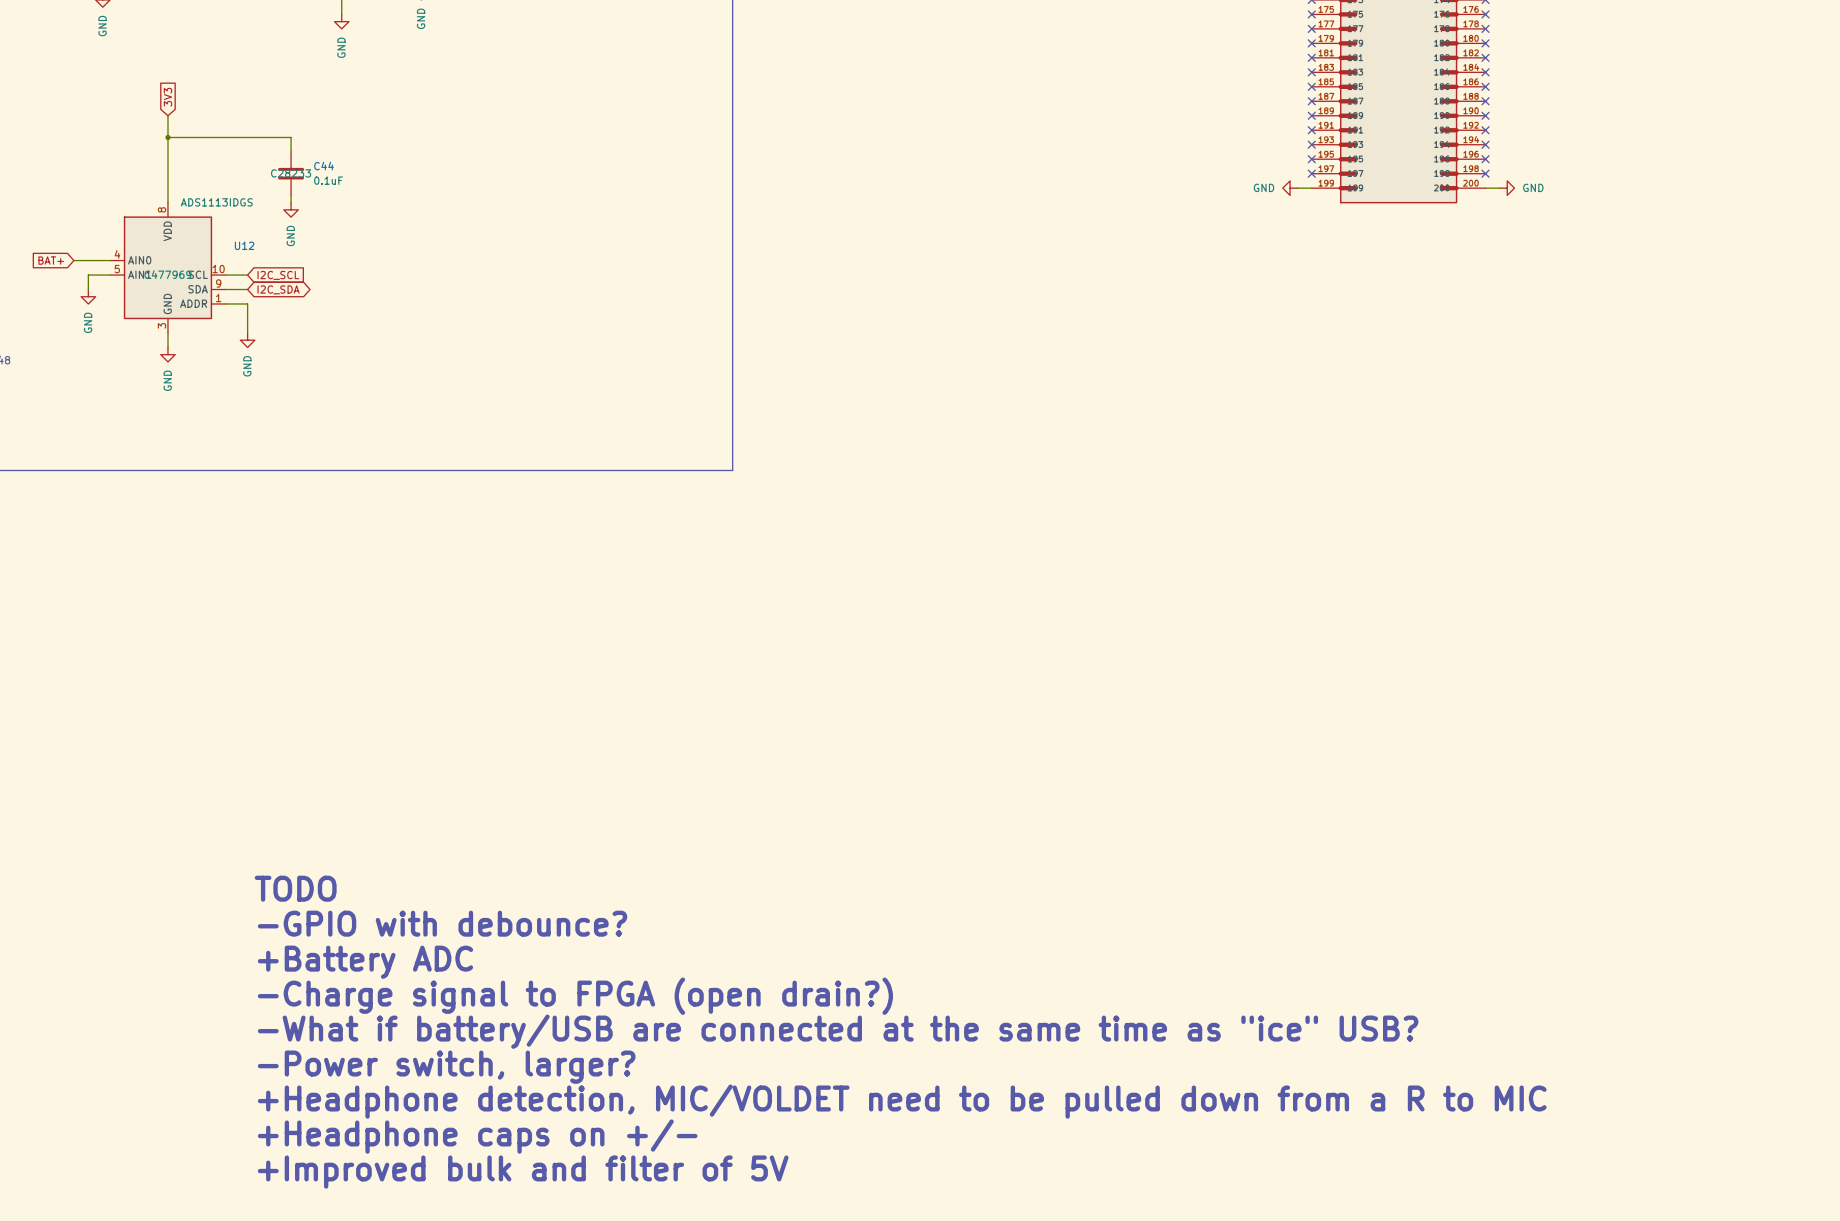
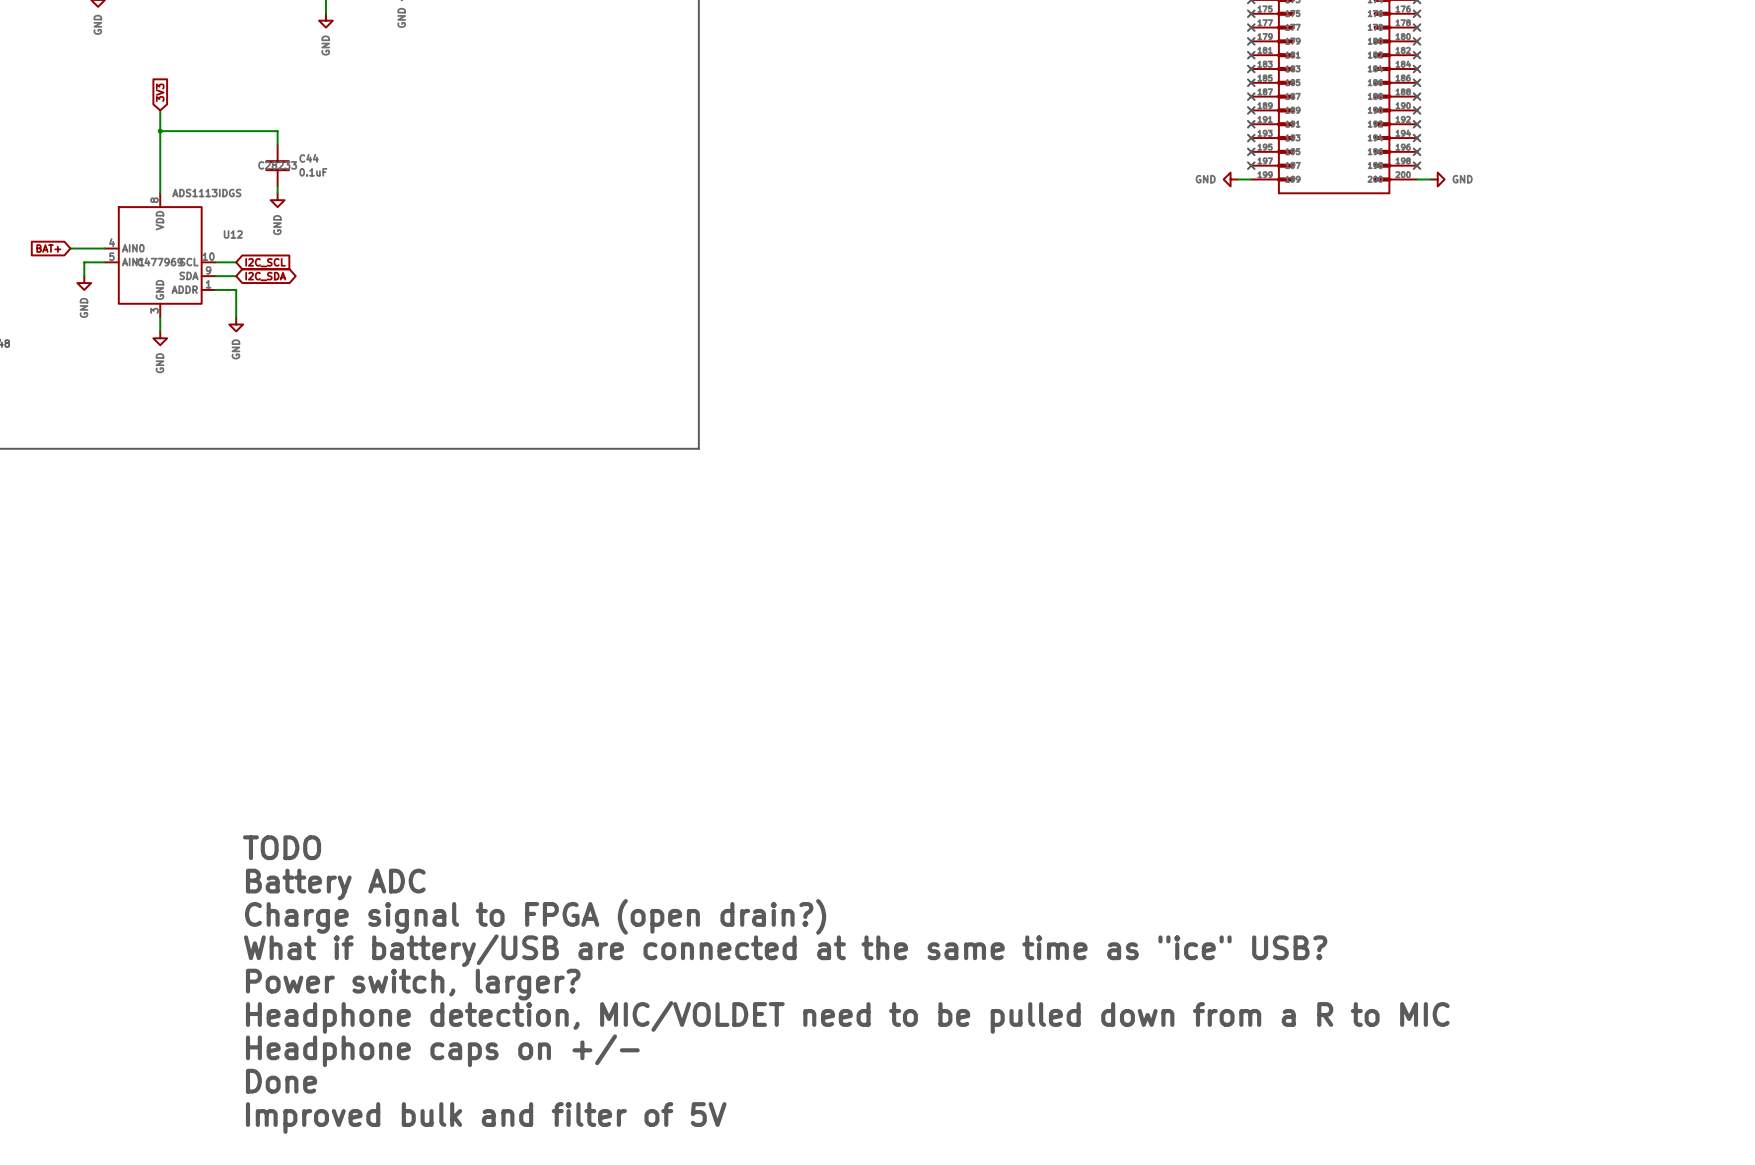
text: -GPIO with debounce? (442, 923) -> Battery ADC (335, 884)
text: +Battery ADC (365, 962) -> Charge signal to FPGA (open drain?) (535, 916)
text: -Charge signal to FPGA (open drain?) (575, 996) -> What if battery/USB are connected at the same time as "ice" USB? (785, 950)
text: -What if battery/USB are connected at the same time as "ice" USB? (838, 1031) -> Power switch, larger? (413, 984)
text: -Power switch, larger? (446, 1067) -> Headphone detection, MIC/VOLDET need to be pulled down from a R to MIC (847, 1017)
text: +Headphone detection, MIC/VOLDET need to be pulled down from a R to MIC (902, 1101) -> Headphone caps on +/- (442, 1050)
text: +Headphone caps on +/- (477, 1136) -> Done (281, 1081)
text: +Improved bulk and filter of 5V (523, 1172) -> Improved bulk and filter of 5V (486, 1117)

